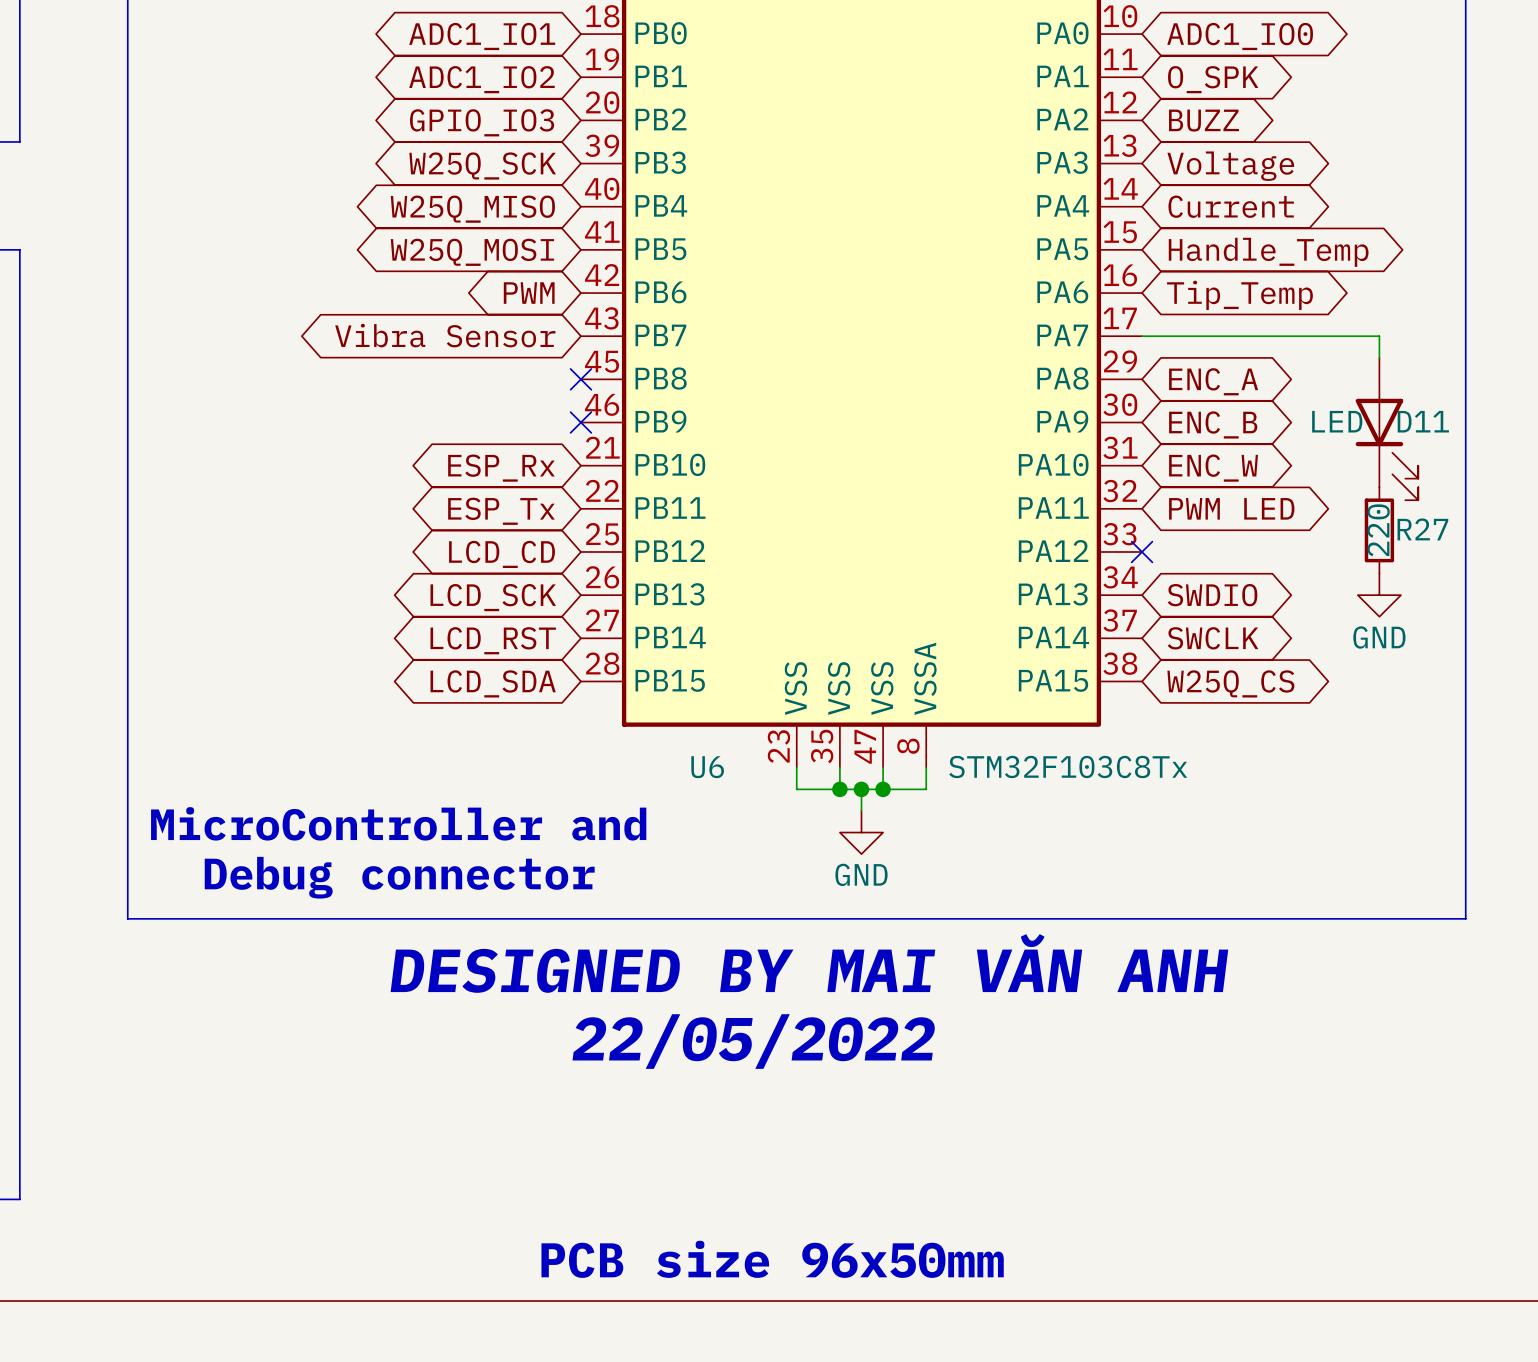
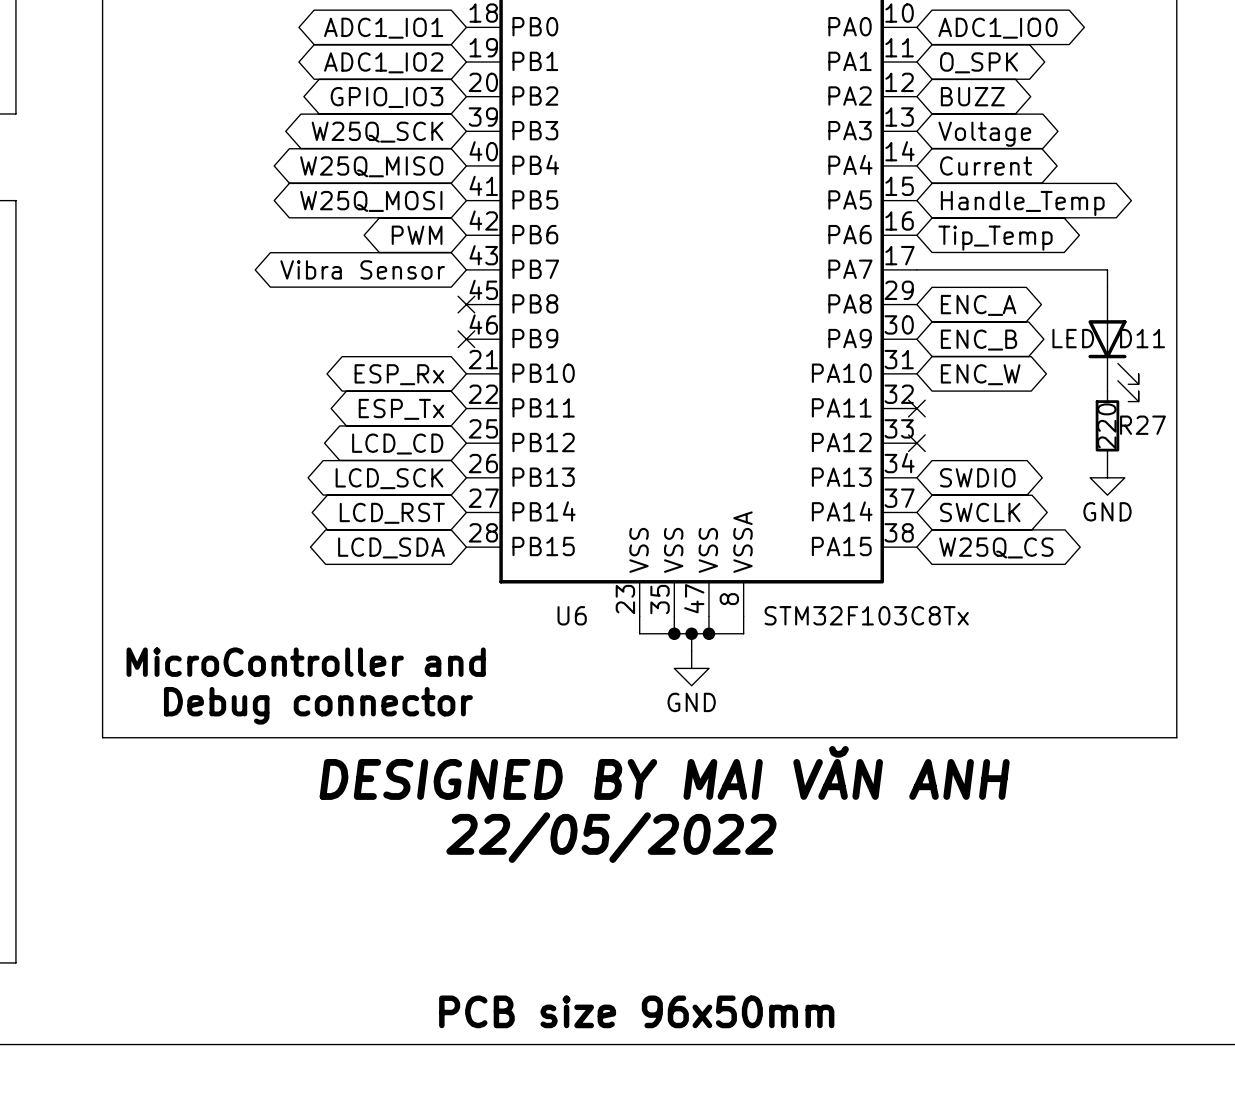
no-connect mark: none -> (916, 408)
global label: PWM LED (1231, 508) -> none

